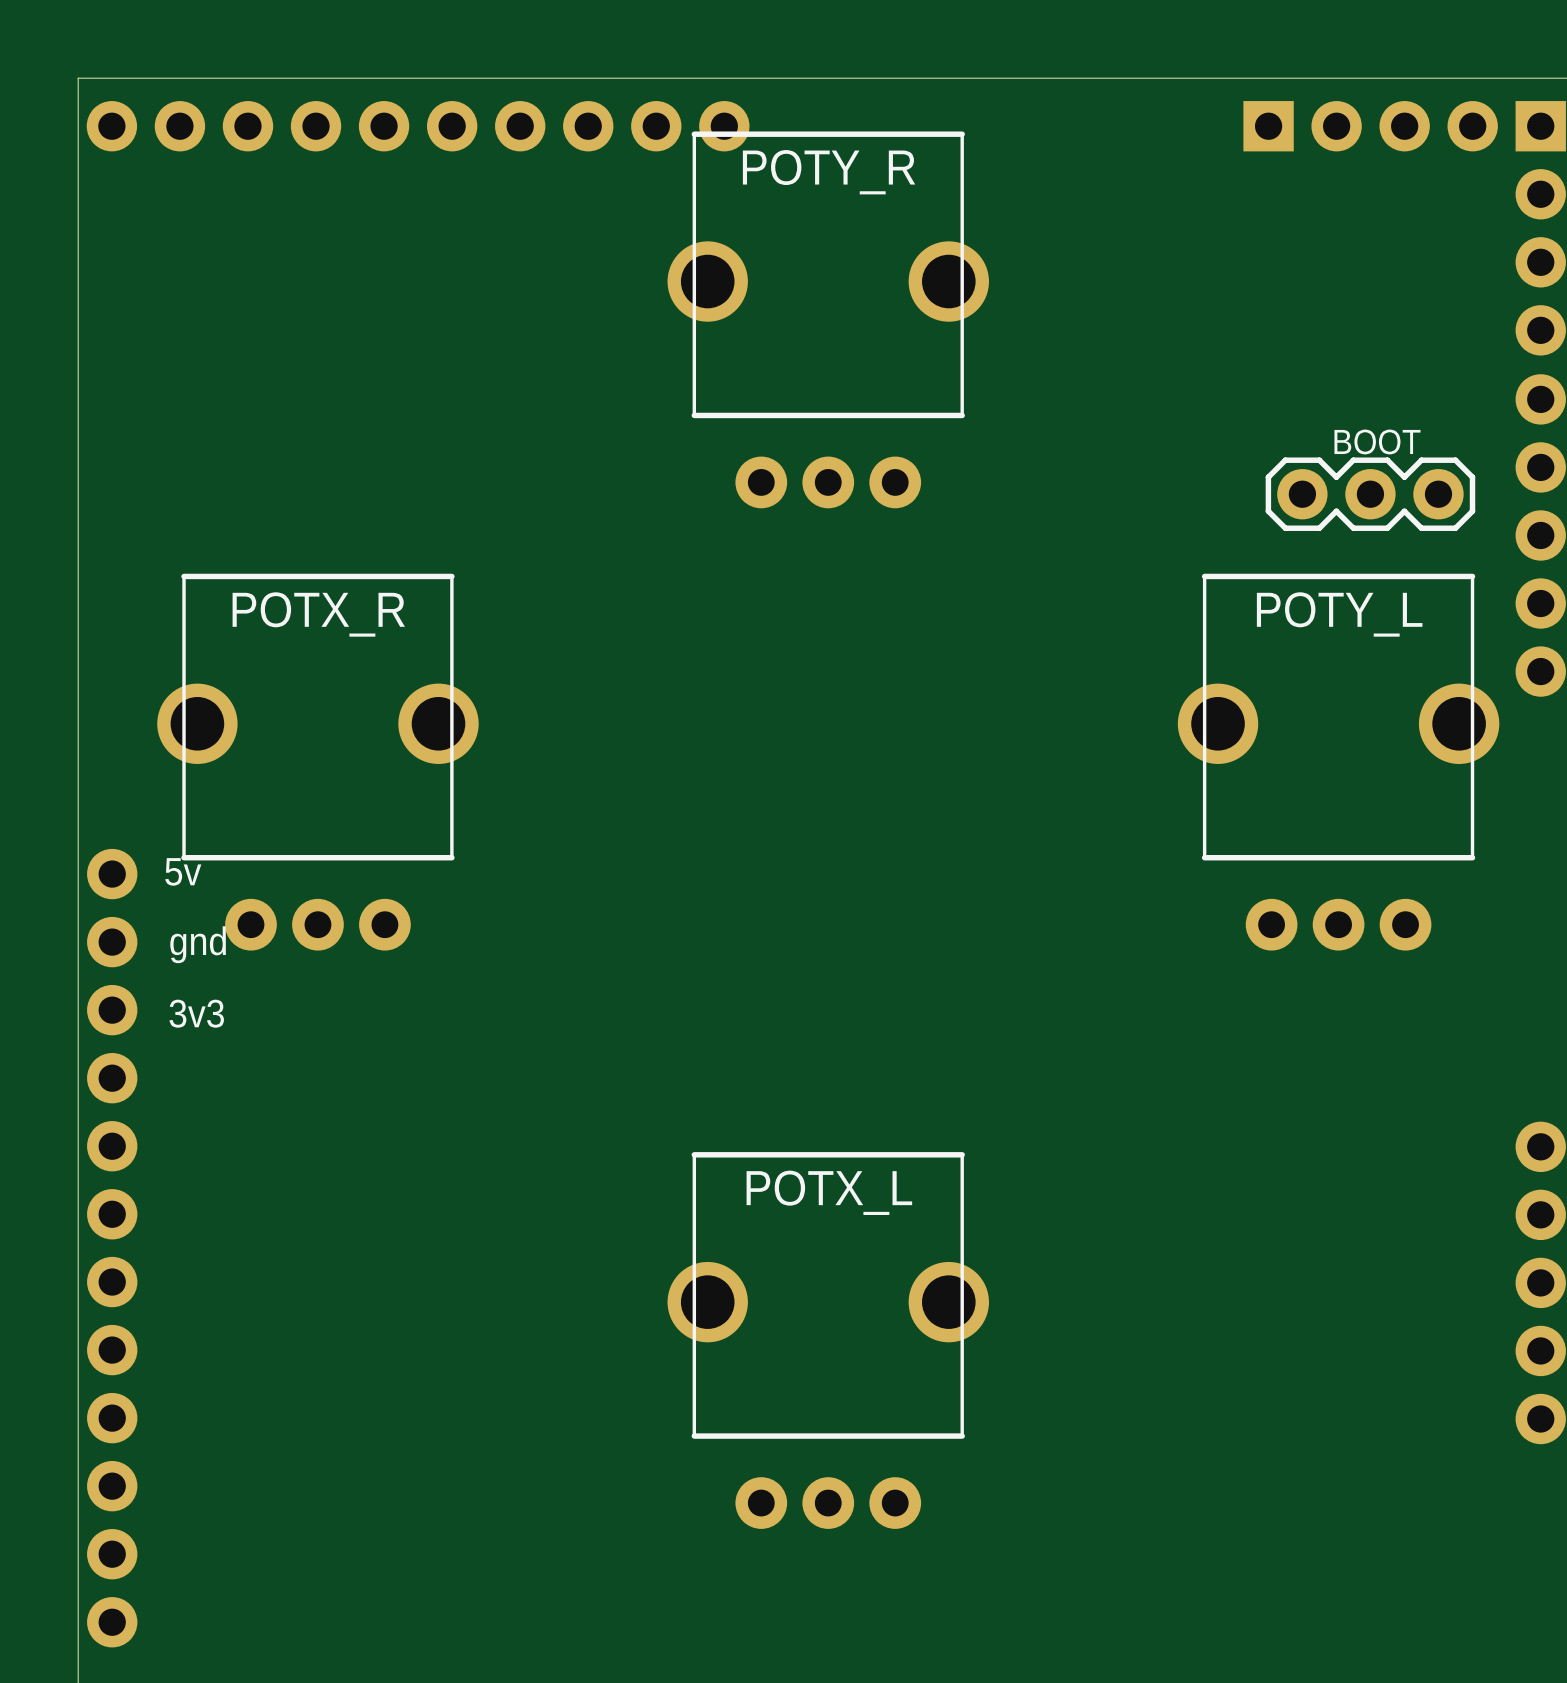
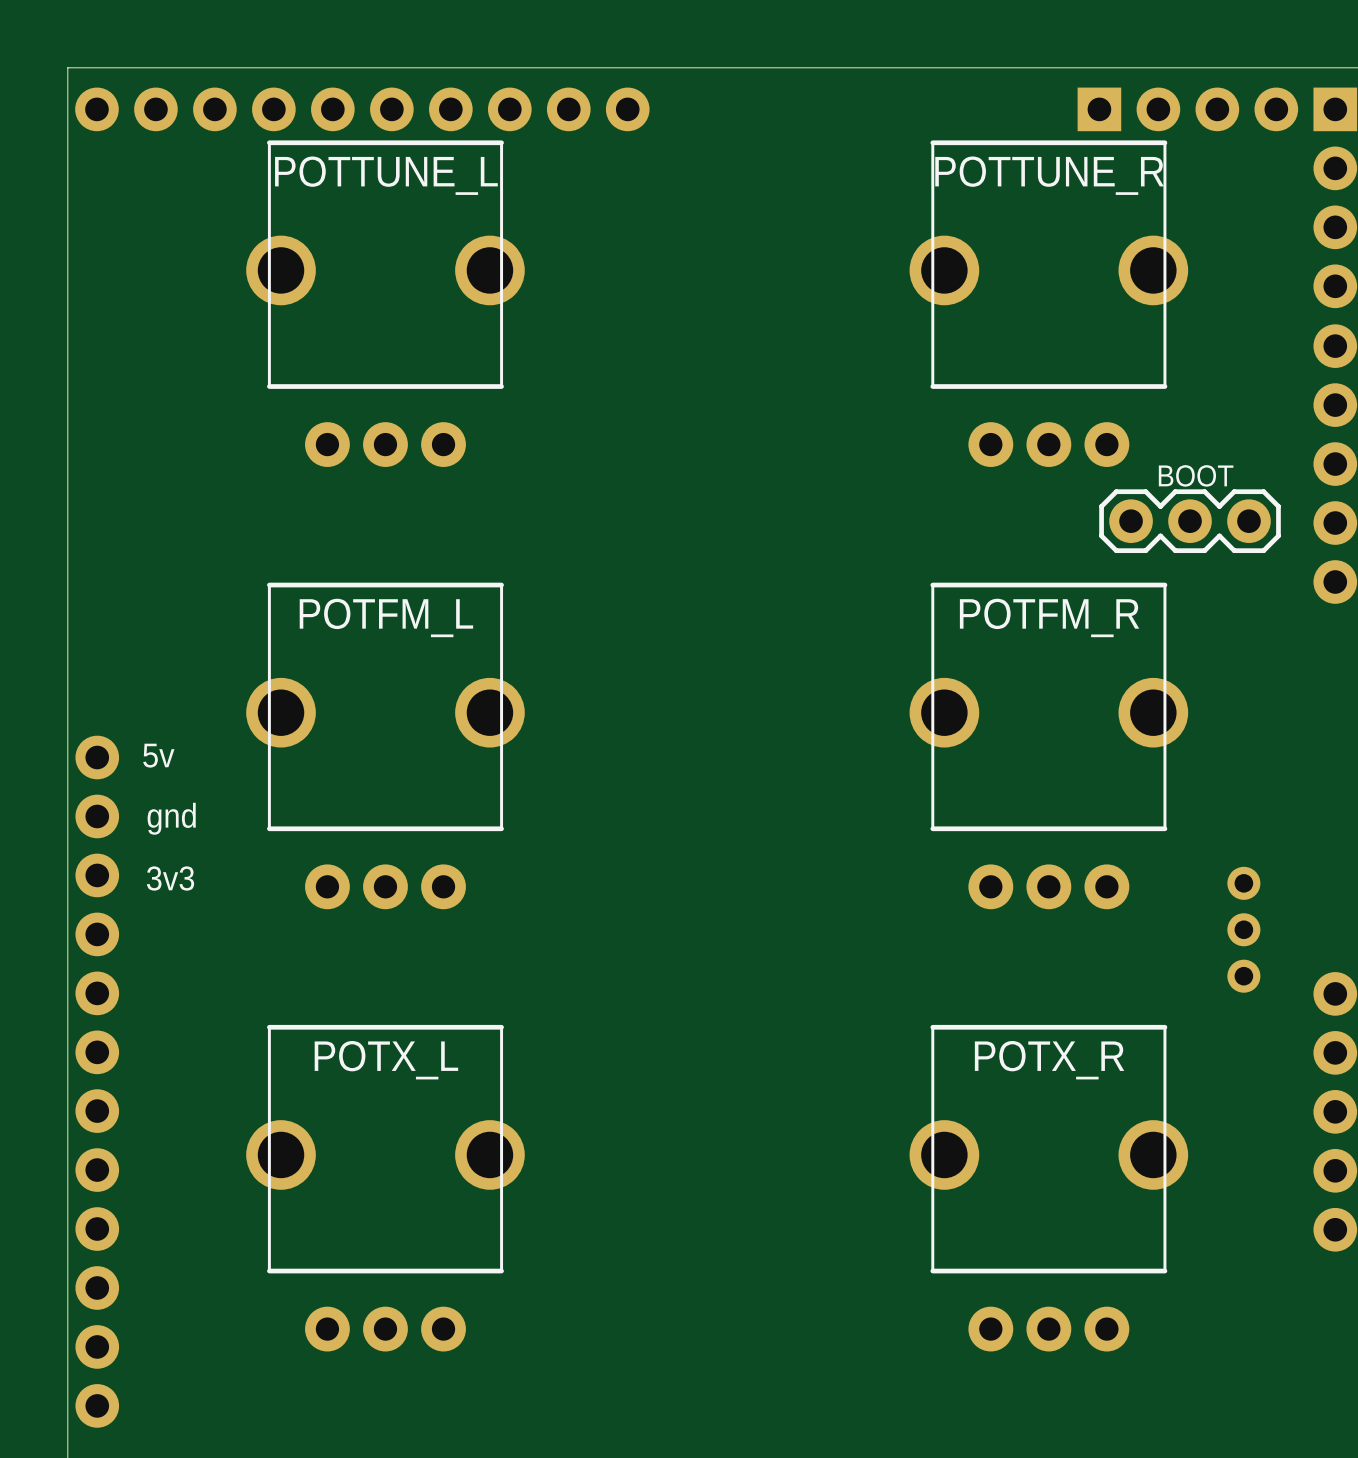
POTY_R: (828, 319) -> none
POTTUNE_L: none -> (385, 303)
POTTUNE_R: none -> (1048, 303)
BOOT position: (1370, 494) -> (1190, 521)
POTX_R: (317, 762) -> none
POTY_L: (1338, 762) -> none
POTFM_L: none -> (385, 745)
POTFM_R: none -> (1048, 745)
part: none -> (1243, 929)
POTX_L position: (828, 1340) -> (385, 1188)
POTX_R: none -> (1048, 1188)

